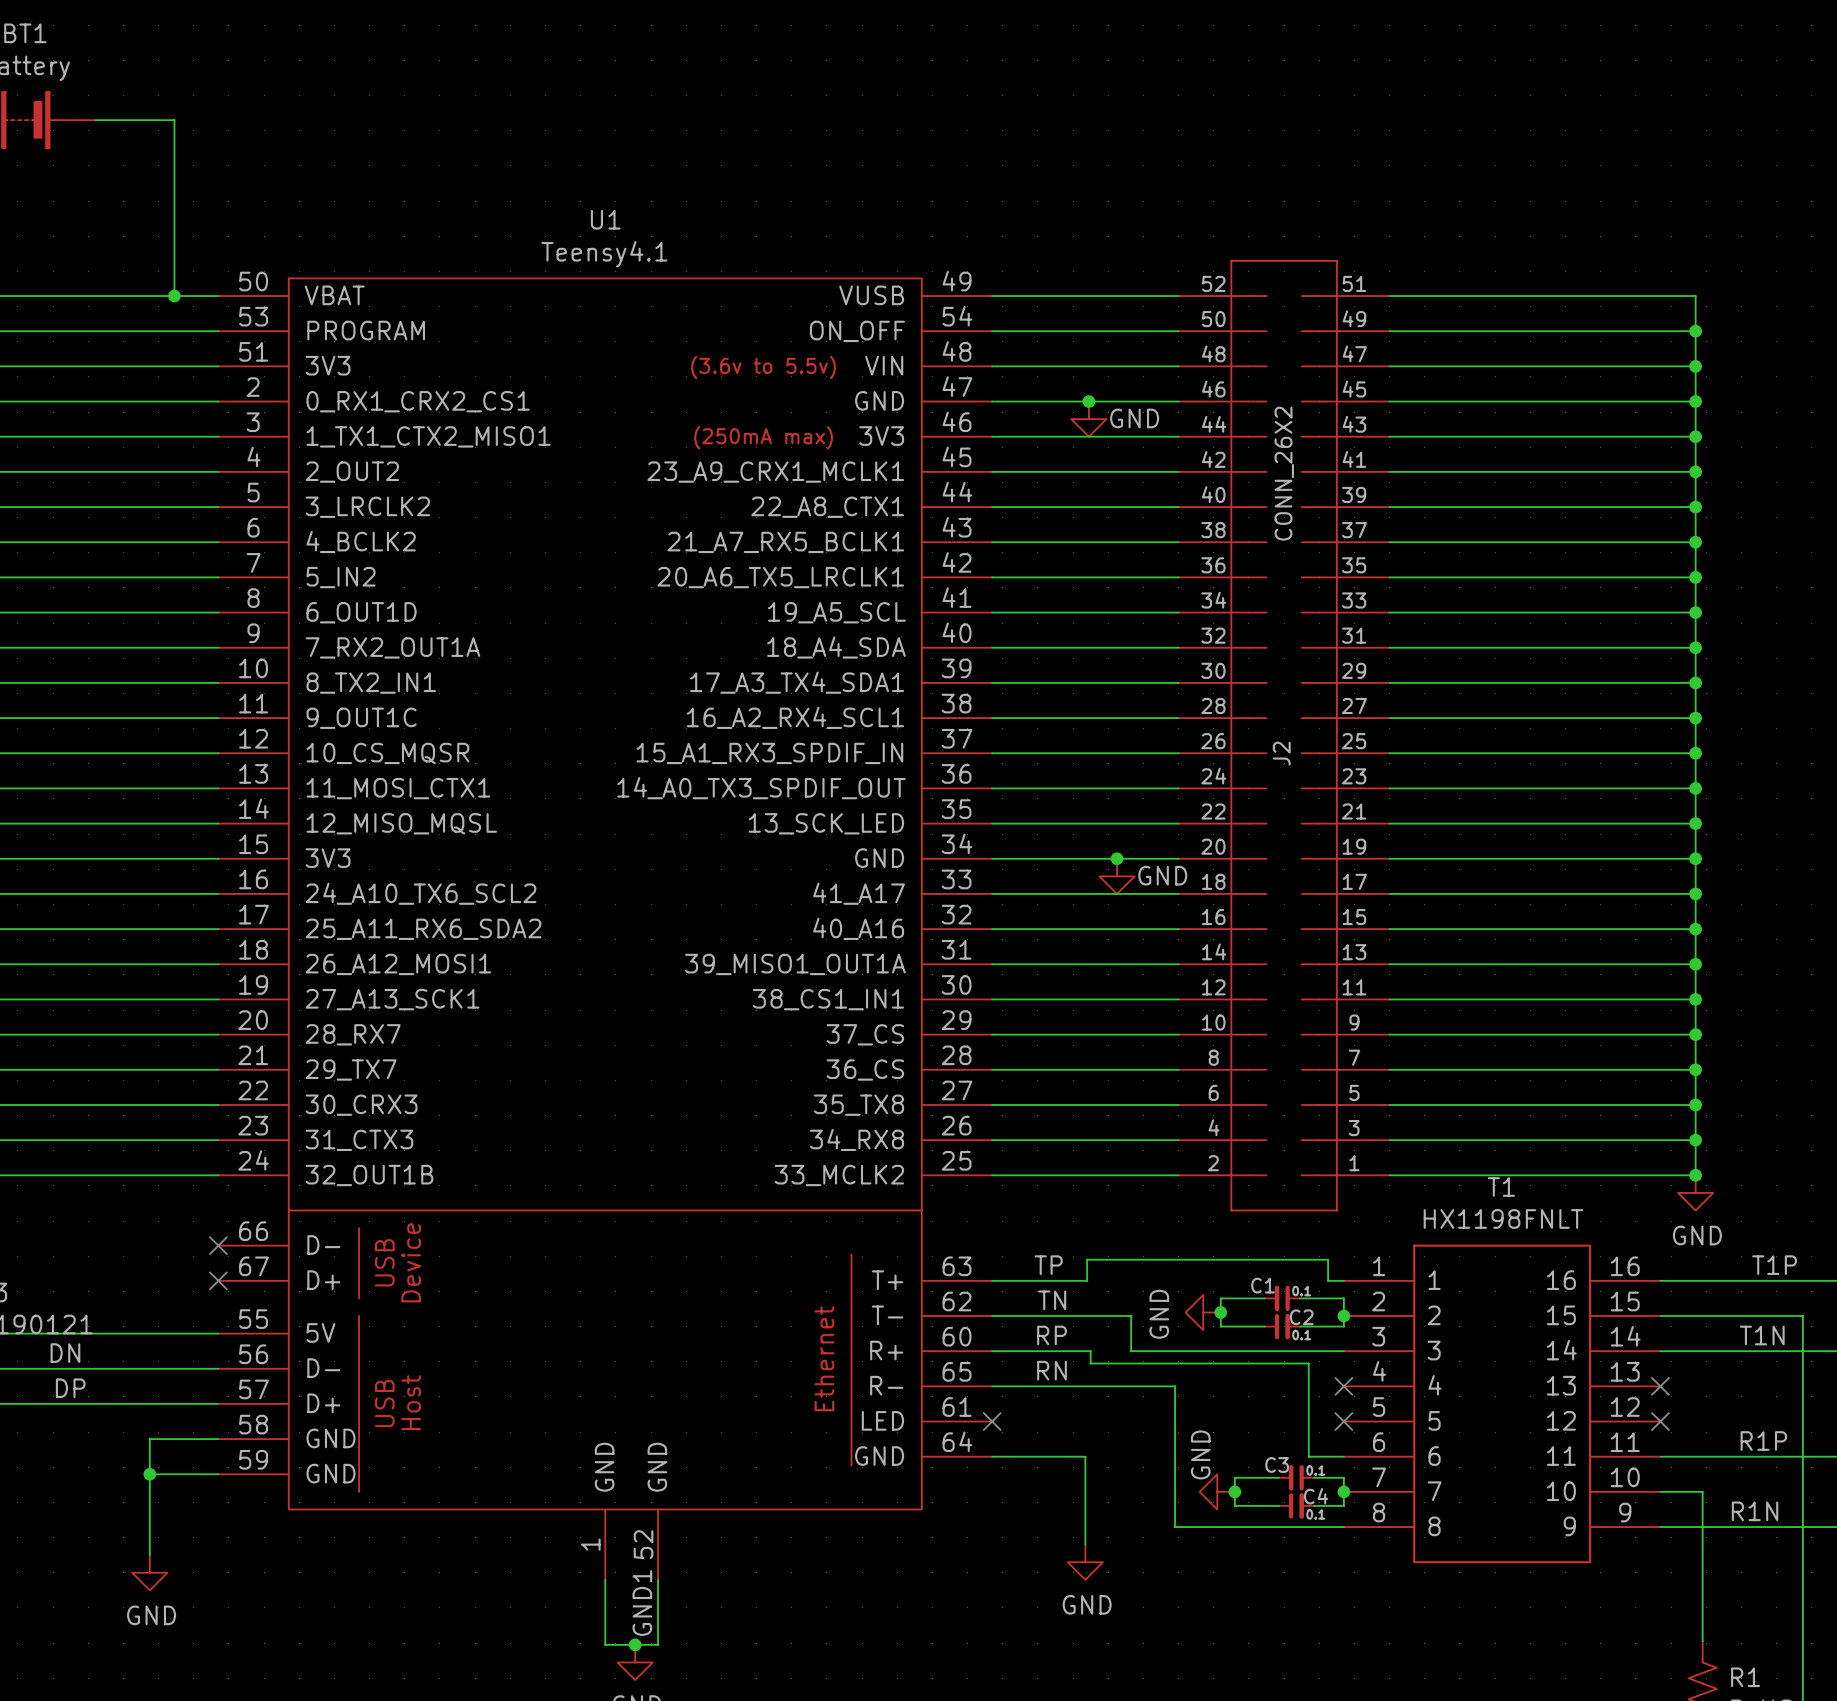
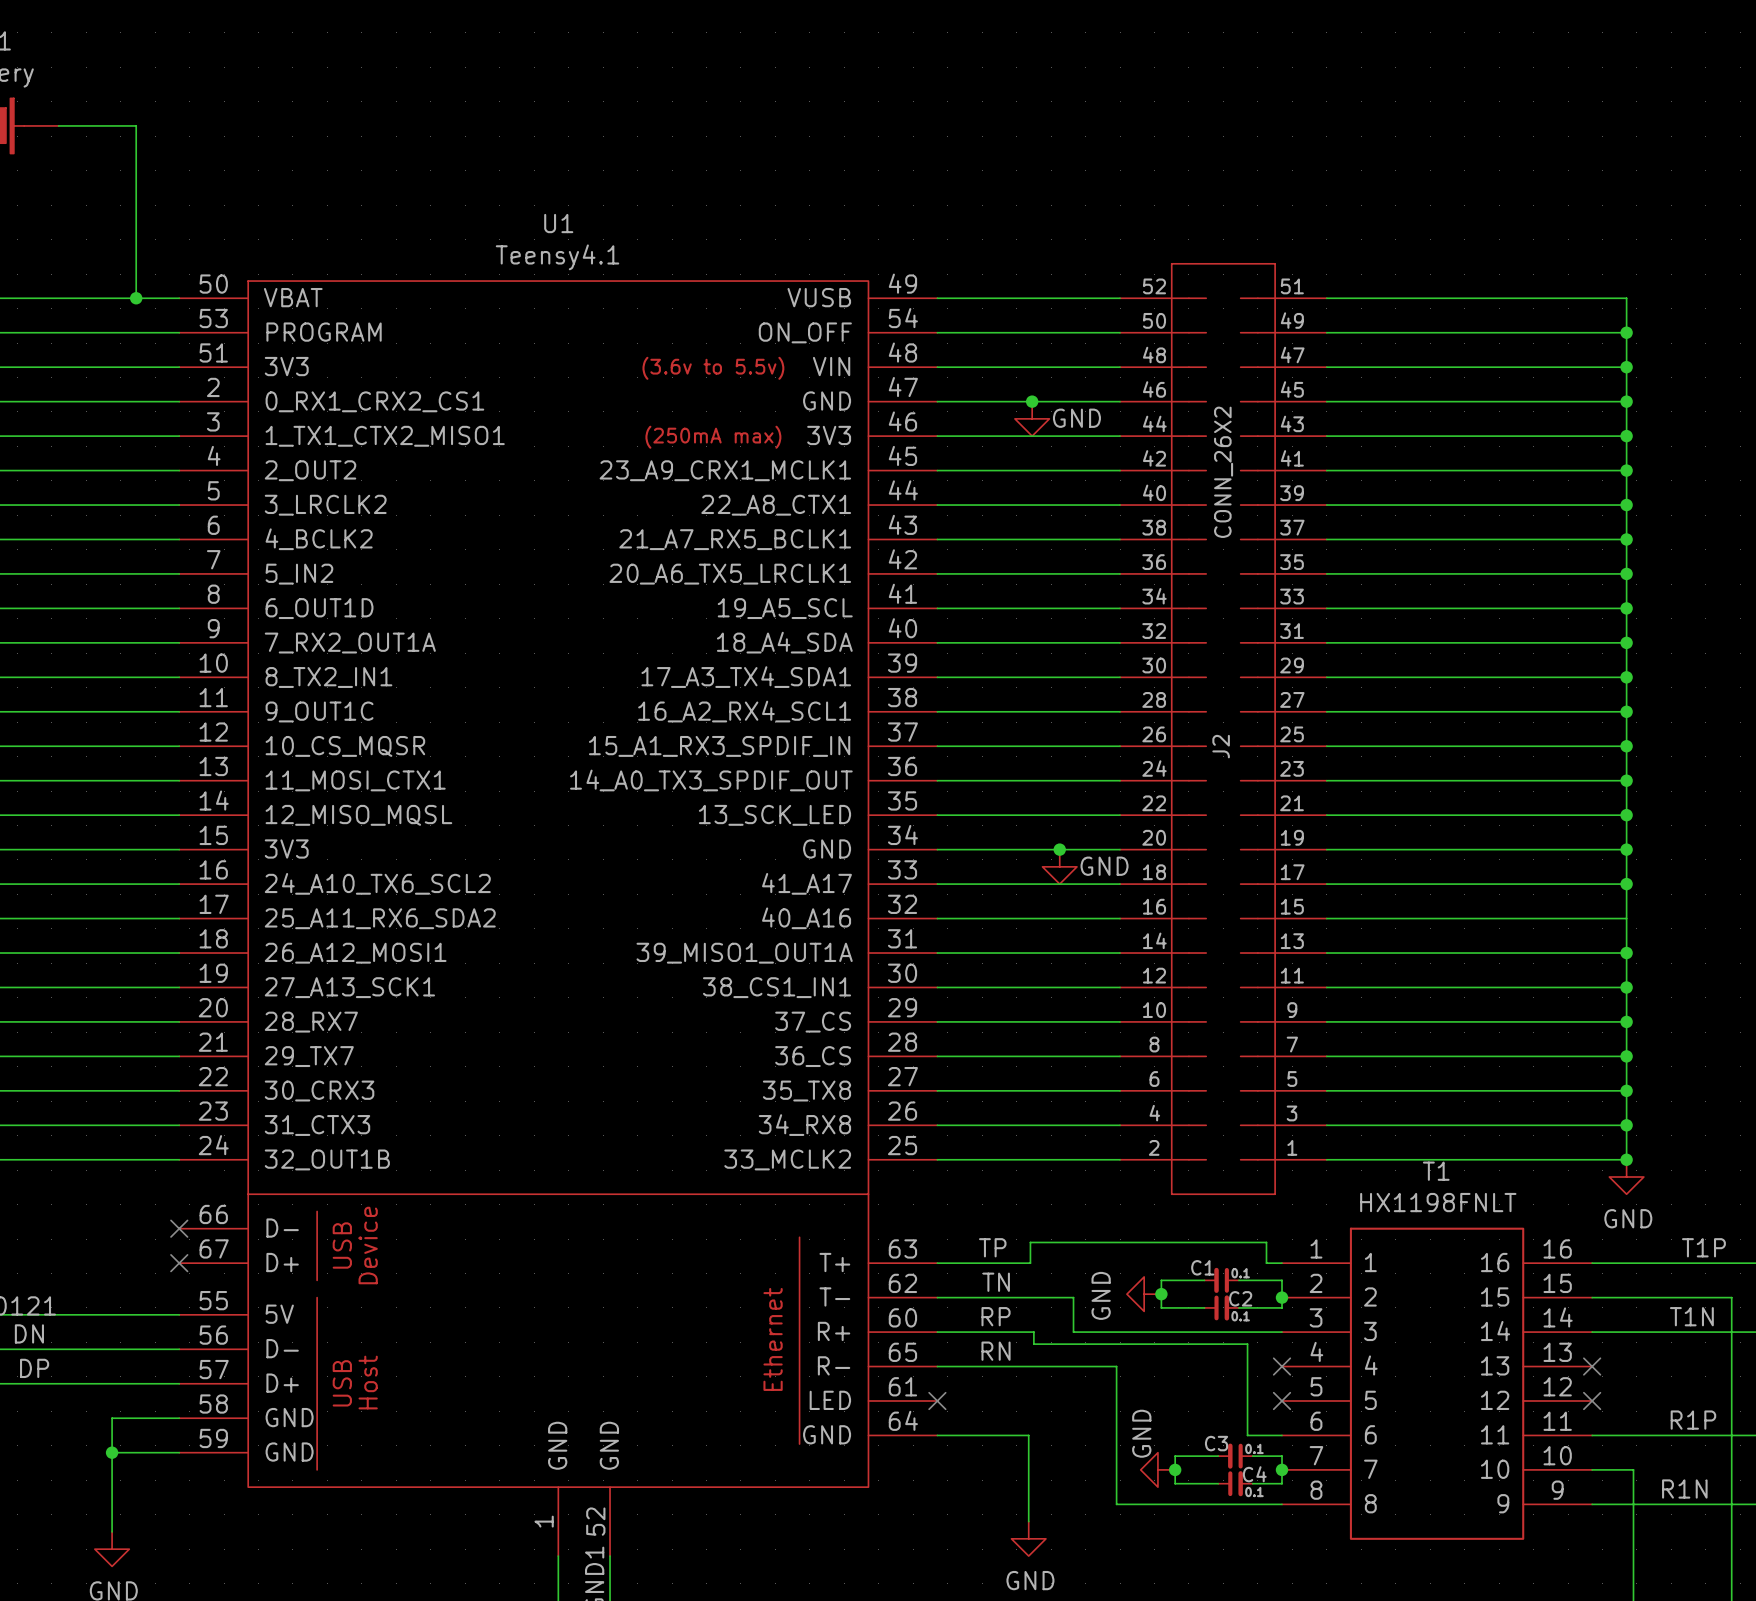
junction: (1695, 929) -> none

